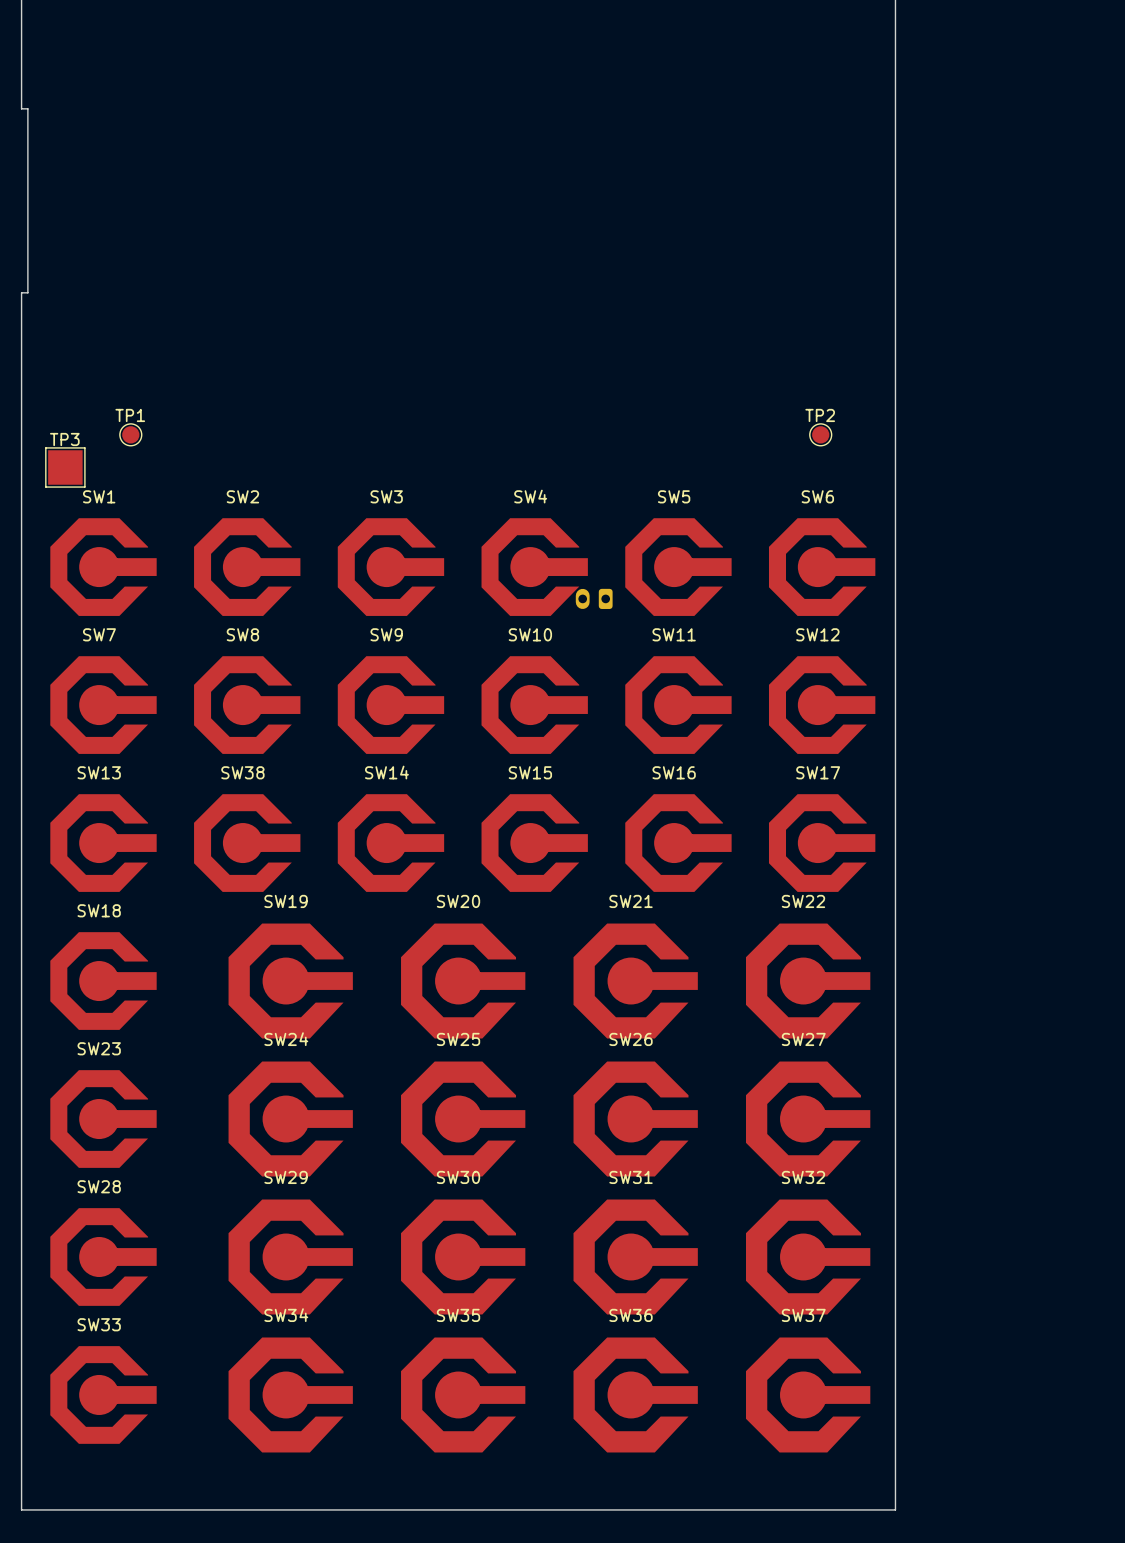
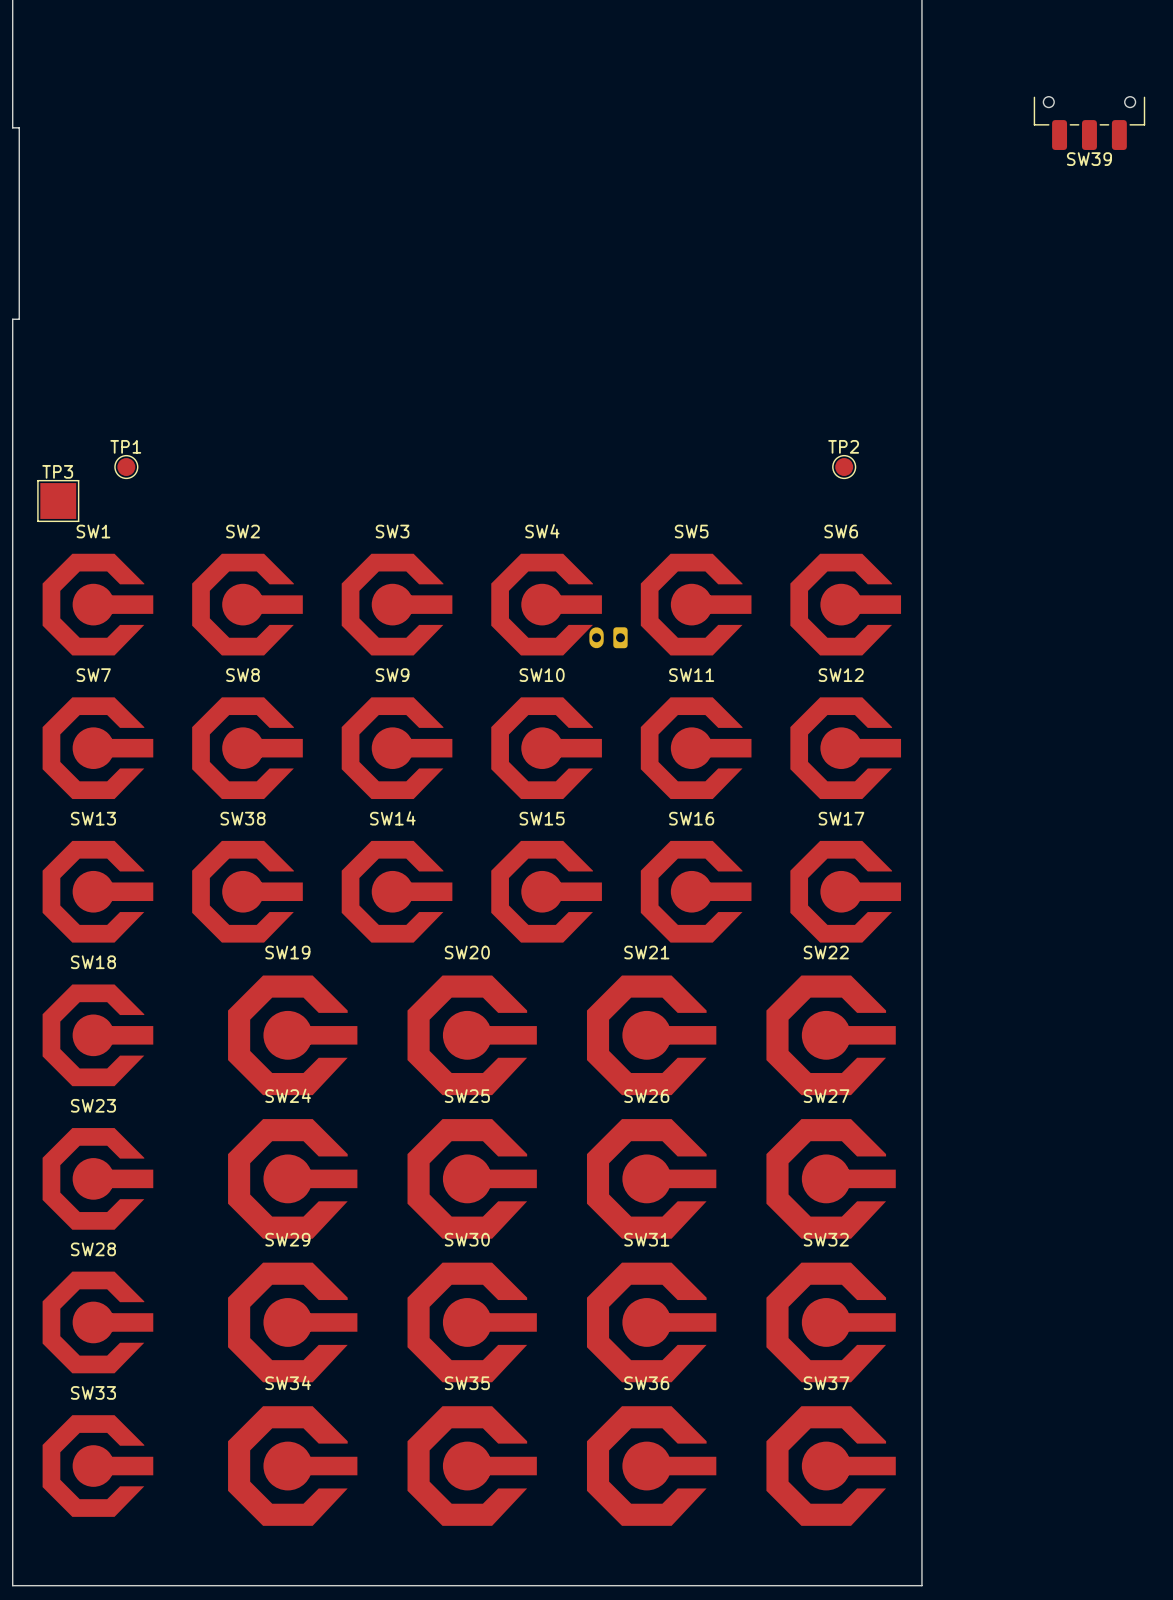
SW39: none -> (1089, 123)

